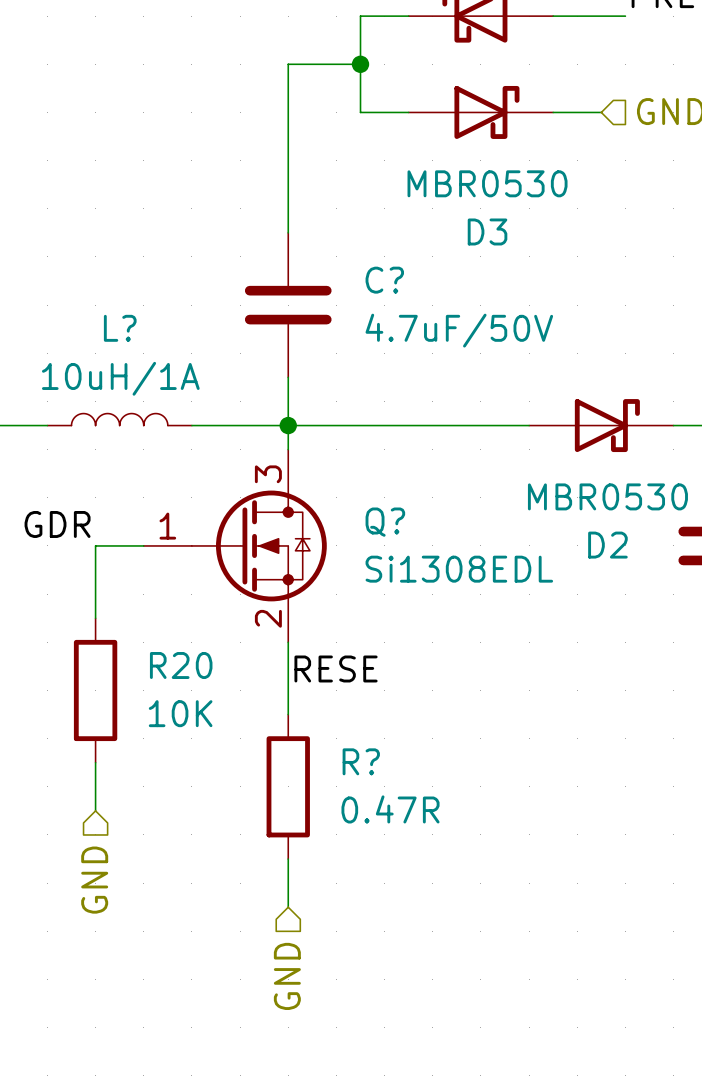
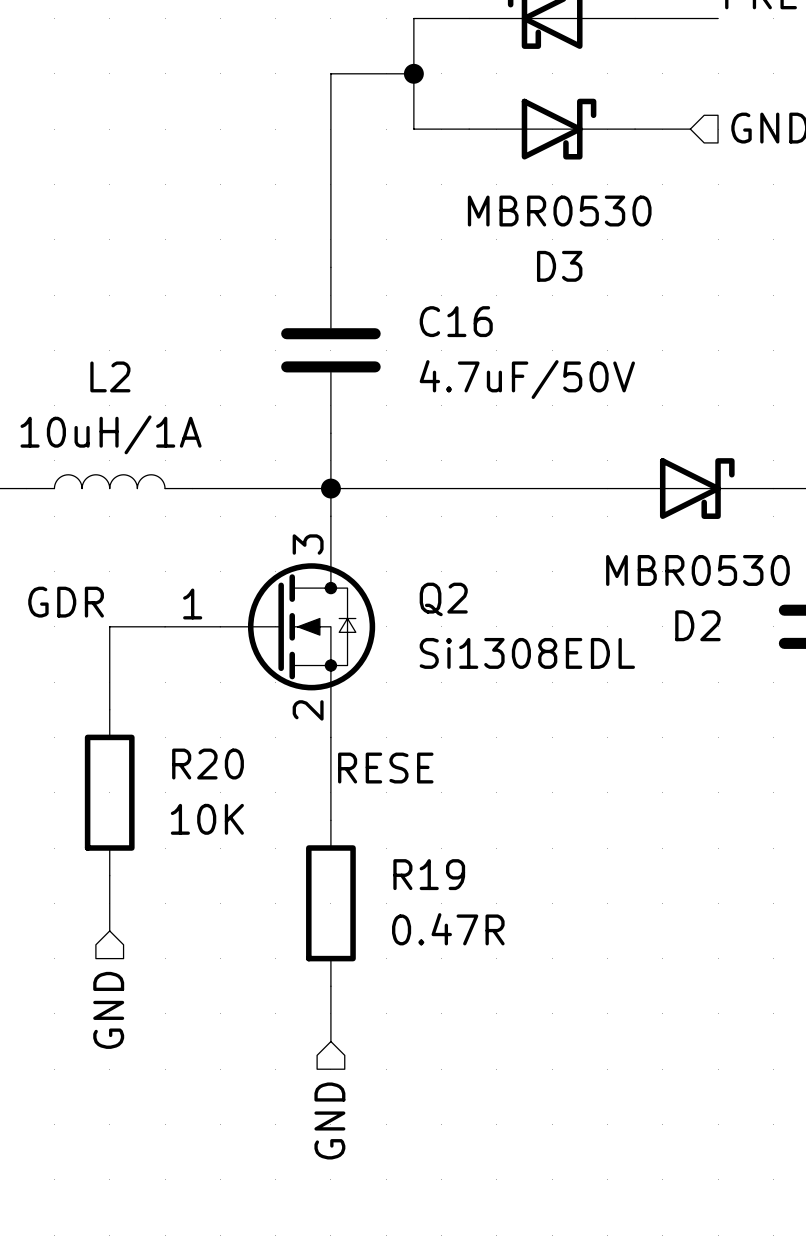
C? name: C? (384, 280) -> C16 (456, 321)
L2: none -> 10uH/1A (109, 481)
L?: 10uH/1A (119, 419) -> none
Q? name: Q? (385, 522) -> Q2 (443, 599)
R? name: R? (361, 761) -> R19 (429, 874)

